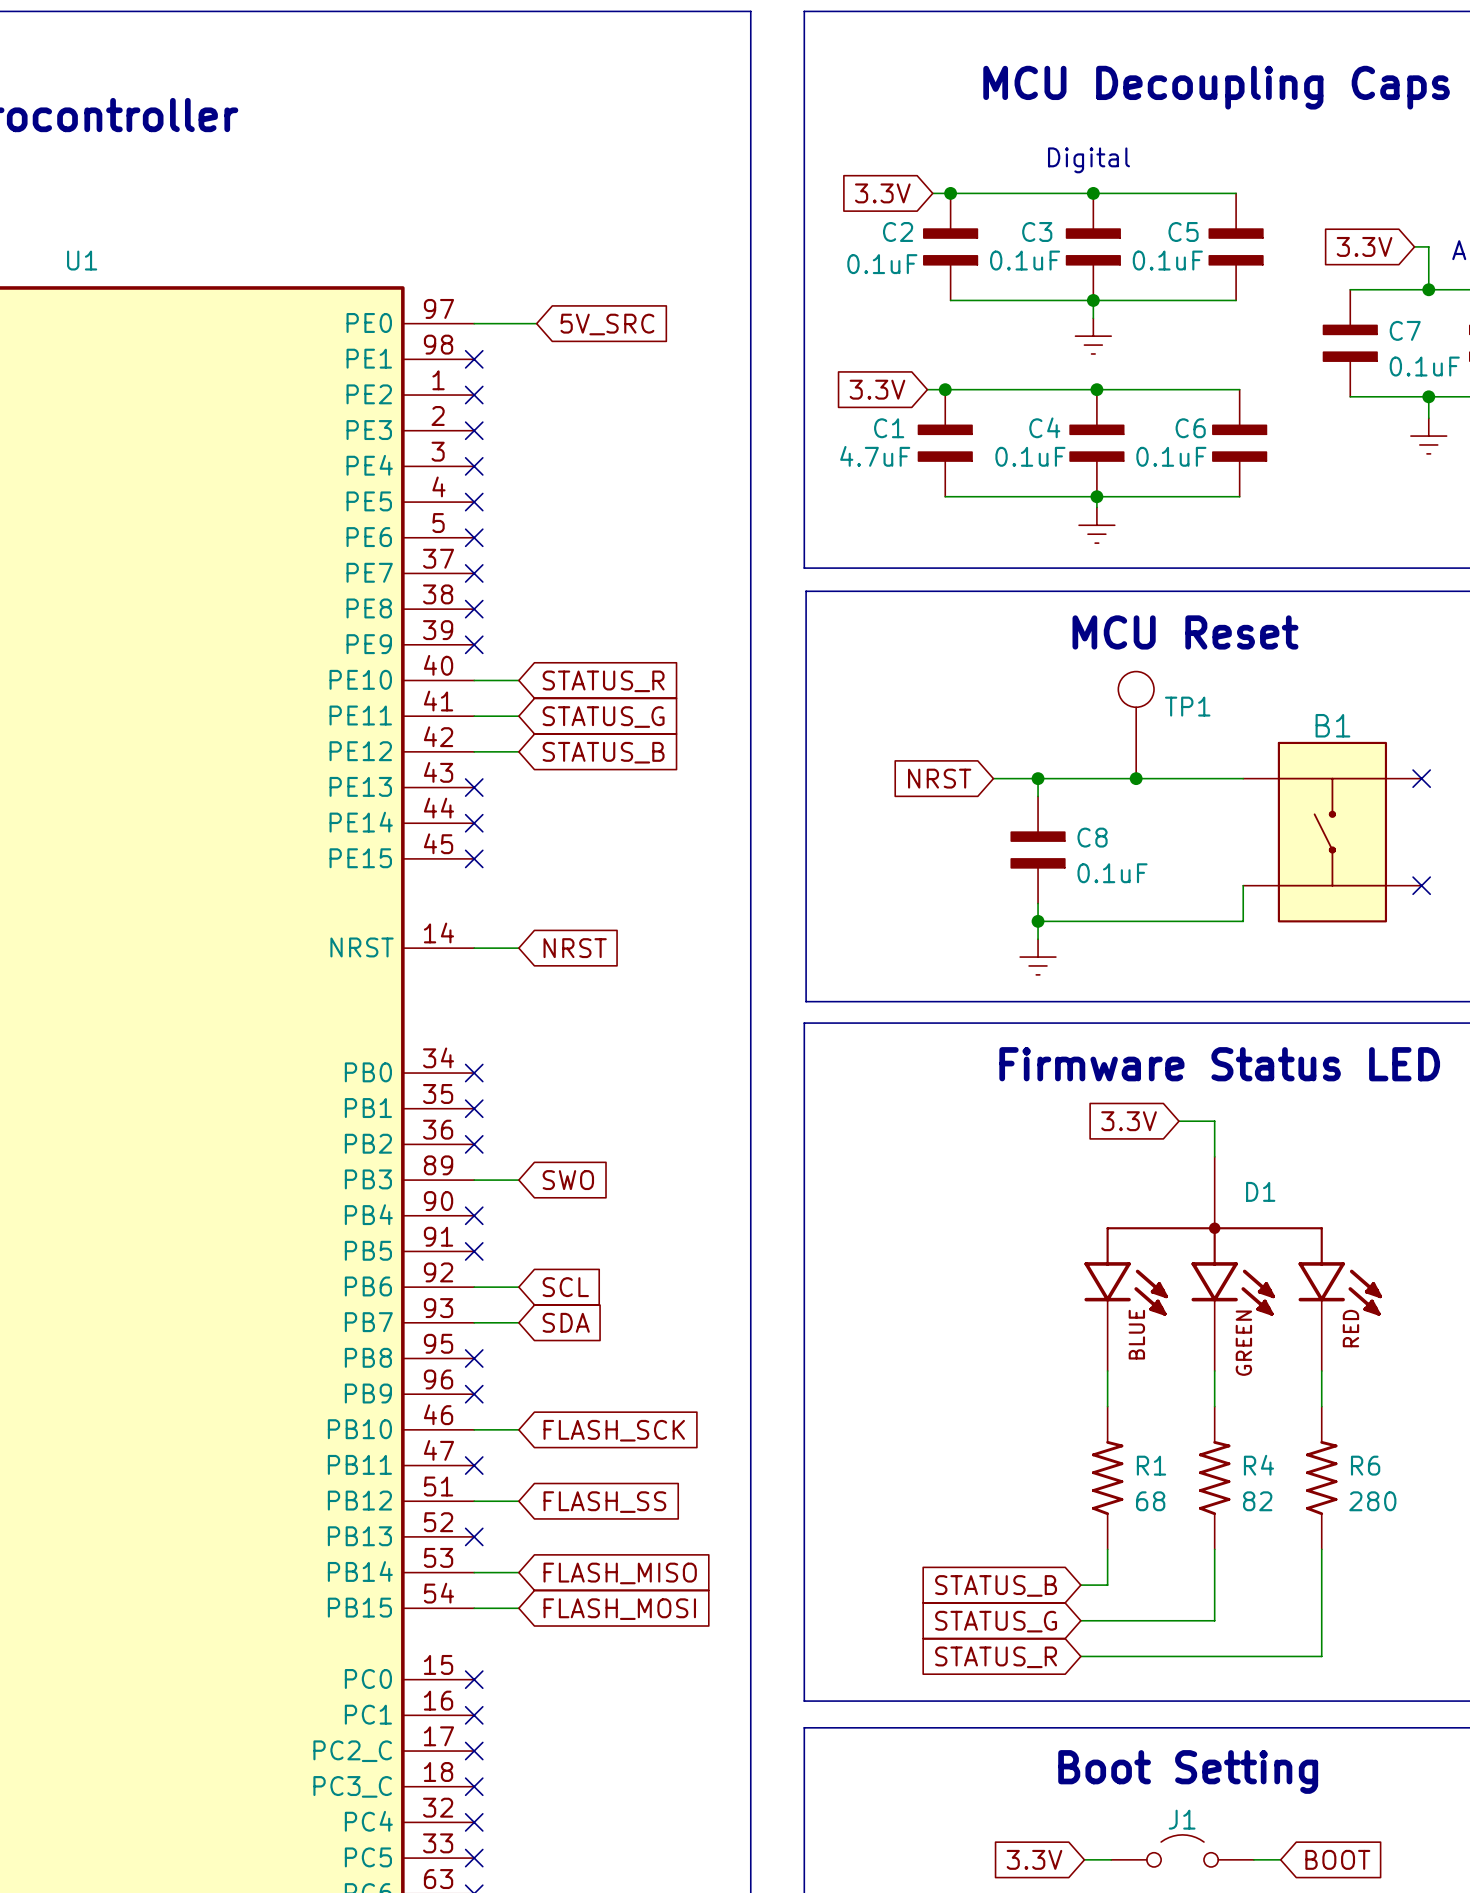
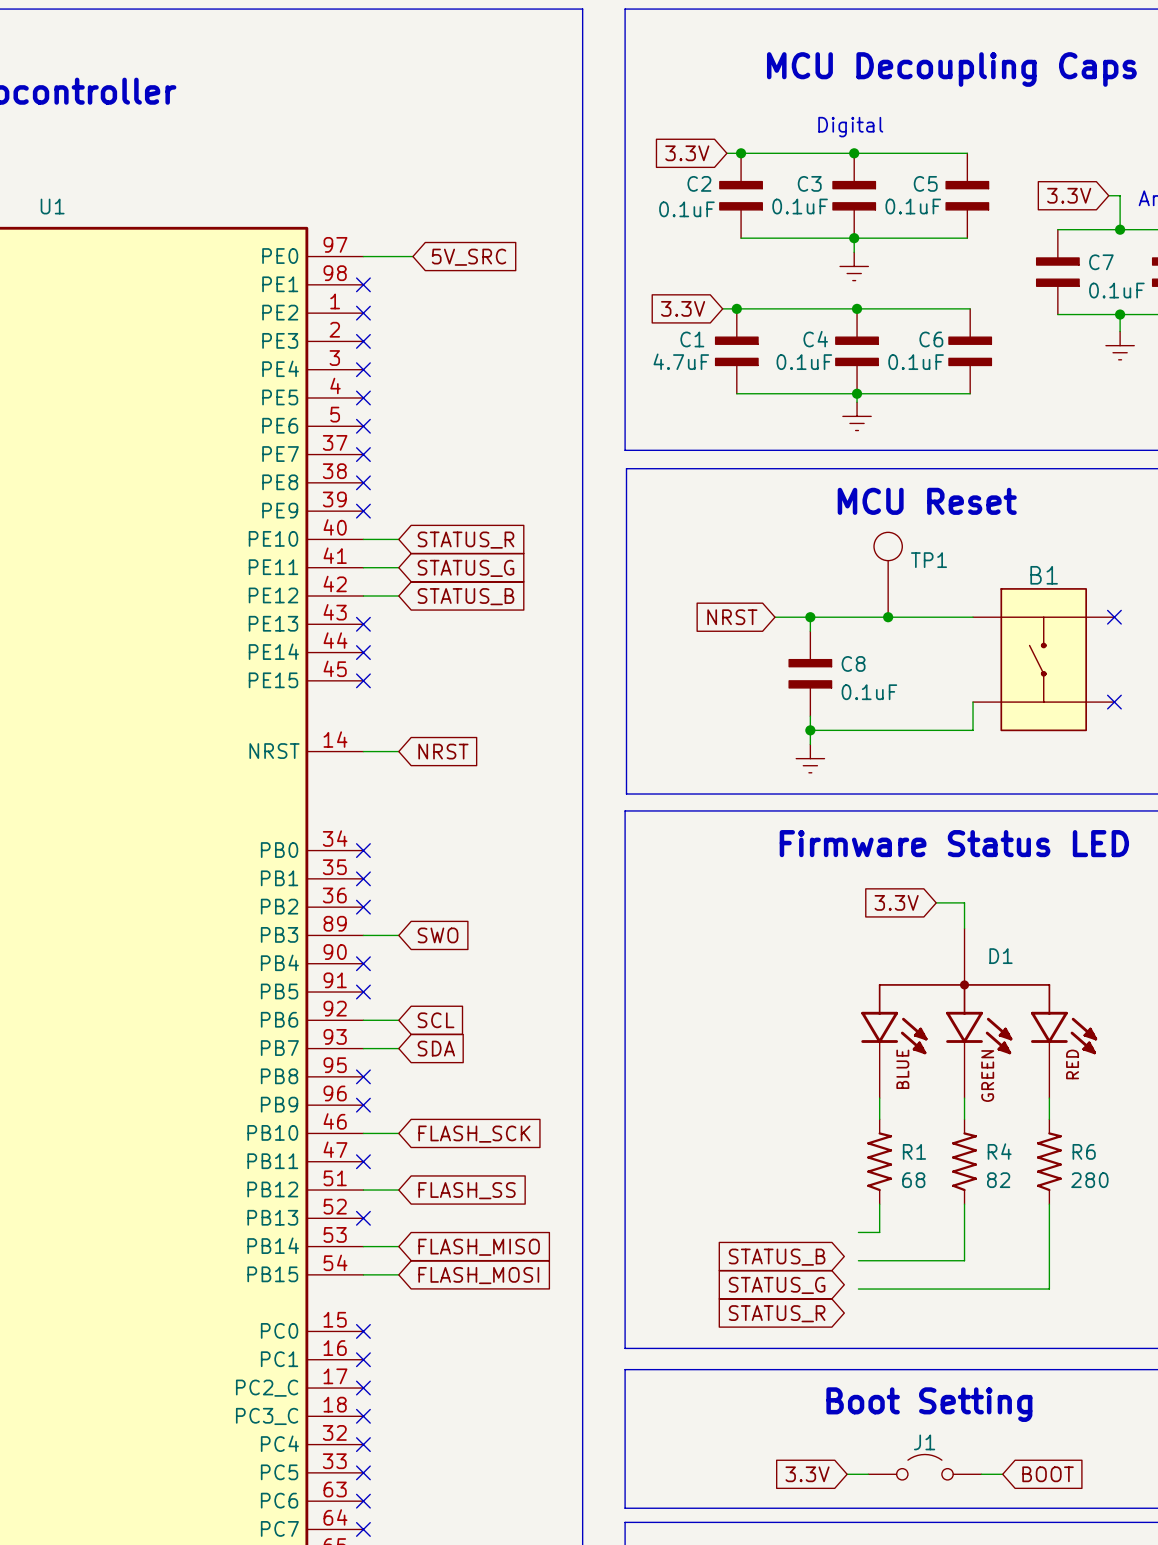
global label position: 3.3V (1129, 1121) -> 3.3V (896, 902)
wire: (1178, 1121) (1214, 1121) (1214, 1156) -> none
wire: none -> (936, 902) (964, 902) (964, 928)
D1 position: (1233, 1263) -> (979, 1013)
wire: (1107, 1370) (1107, 1406) -> none
wire: (1214, 1370) (1214, 1406) -> none
wire: (1321, 1370) (1321, 1406) -> none
wire: none -> (879, 1098) (879, 1119)
wire: none -> (964, 1098) (964, 1119)
wire: none -> (1049, 1098) (1049, 1119)
R1 symbol: [1091, 1406, 1124, 1550] -> [867, 1119, 893, 1205]
R4 symbol: [1198, 1406, 1231, 1550] -> [952, 1119, 977, 1205]
R6 symbol: [1306, 1406, 1338, 1550] -> [1036, 1119, 1062, 1205]
wire: (1107, 1549) (1107, 1585) (1080, 1585) -> (879, 1204) (879, 1232) (858, 1232)
wire: (1214, 1549) (1214, 1620) (1080, 1620) -> (964, 1204) (964, 1260) (858, 1260)
wire: (1321, 1549) (1321, 1656) (1080, 1656) -> (1049, 1204) (1049, 1289) (858, 1289)

